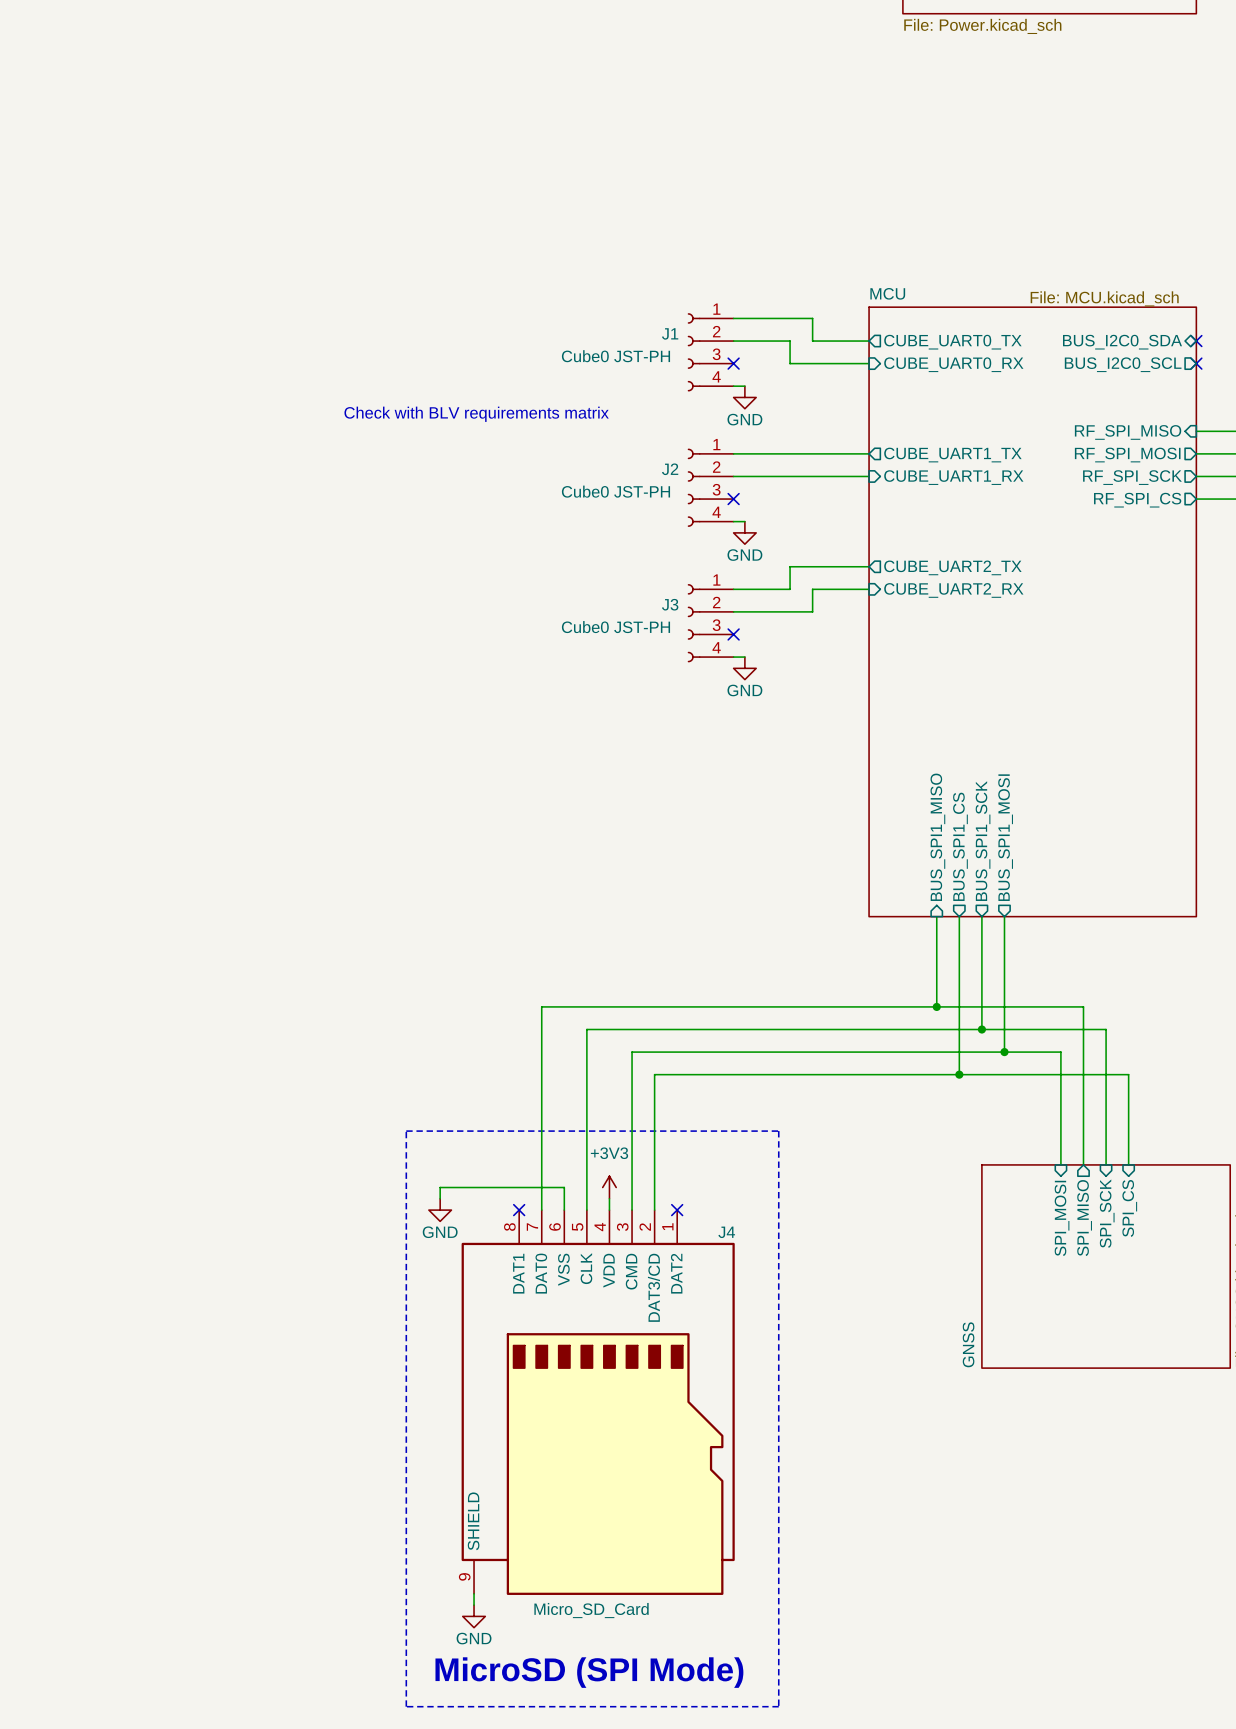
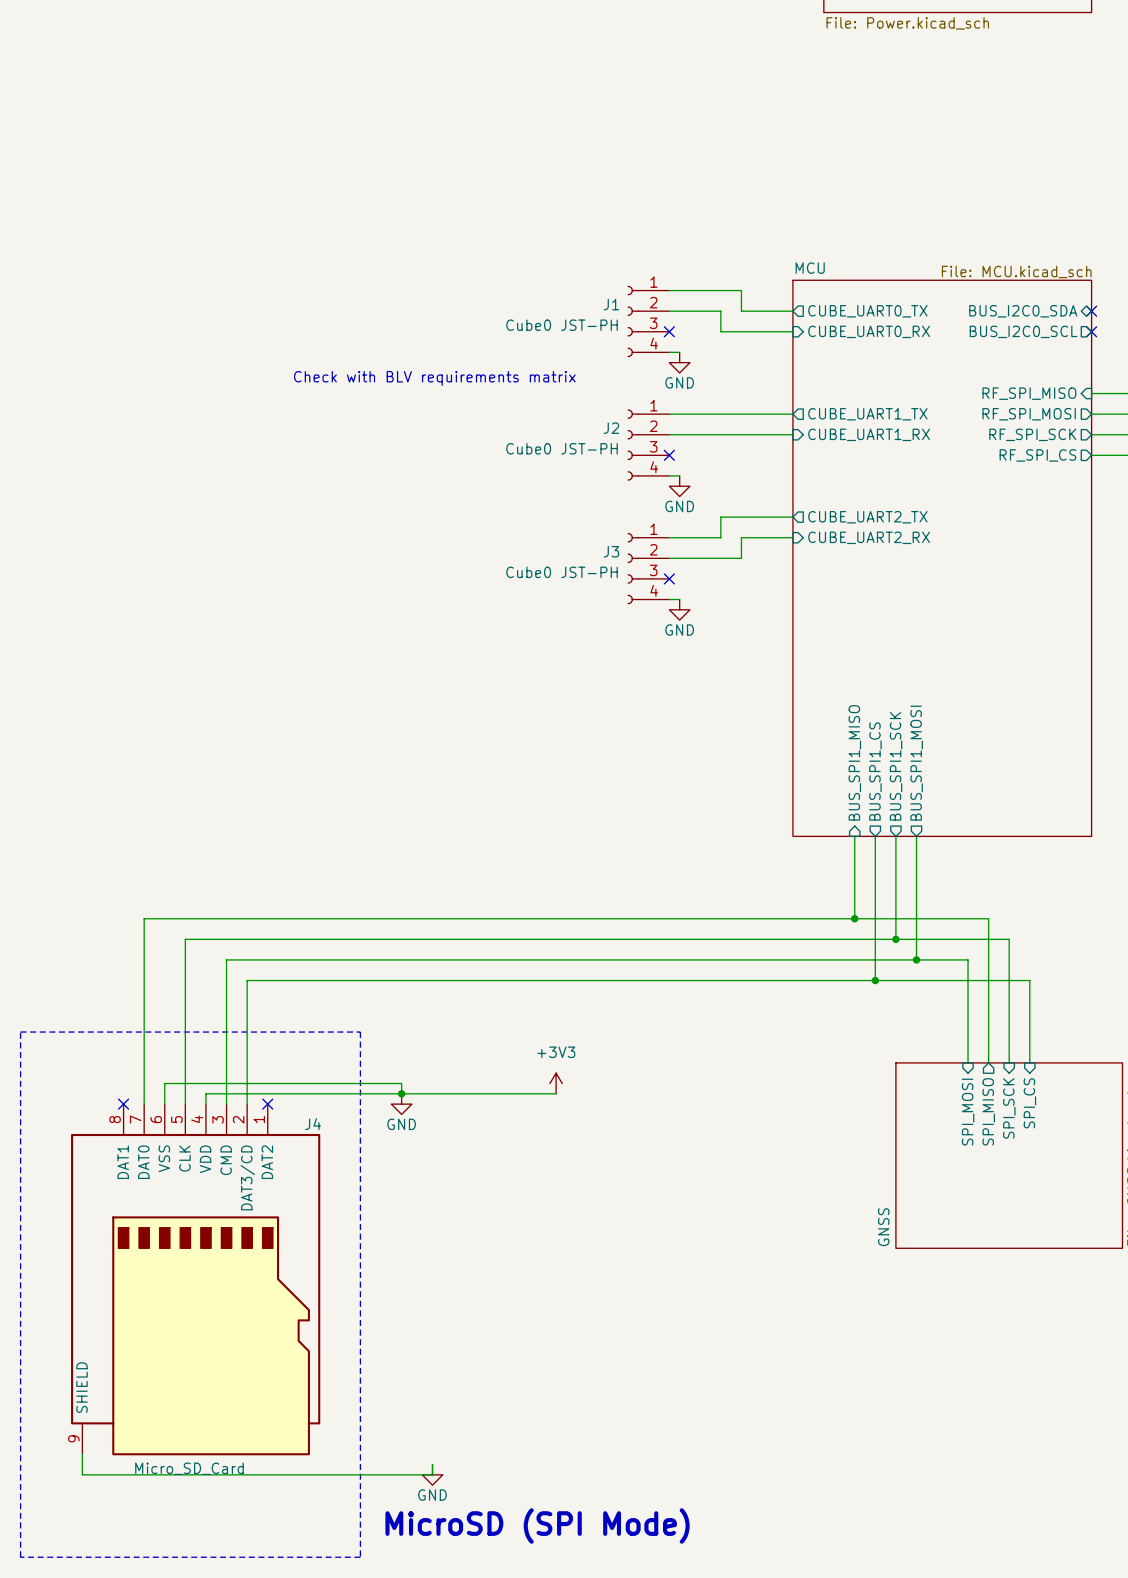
wire: (541, 1006) (541, 1210) -> (494, 918) (144, 918) (144, 1104)
wire: (586, 1029) (586, 1210) -> (535, 939) (185, 939) (185, 1104)
wire: (632, 1052) (632, 1210) -> (576, 959) (226, 959) (226, 1104)
wire: (654, 1074) (654, 1210) -> (597, 980) (247, 980) (247, 1104)
line: none -> (20, 1032) (360, 1032) (360, 1557) (20, 1557) (20, 1032)
line: (406, 1131) (778, 1131) (778, 1706) (406, 1706) (406, 1131) -> none
wire: (440, 1187) (564, 1187) (564, 1210) -> (401, 1083) (164, 1083) (164, 1104)
junction: none -> (401, 1093)
wire: (609, 1198) (609, 1210) -> (556, 1093) (205, 1093) (205, 1104)
no-connect mark: none -> (123, 1104)
no-connect mark: none -> (267, 1104)
no-connect mark: (519, 1210) -> none
no-connect mark: (677, 1210) -> none
J4 position: (598, 1402) -> (195, 1279)
wire: (474, 1593) (474, 1605) -> (82, 1454) (82, 1474) (432, 1474) (432, 1464)

